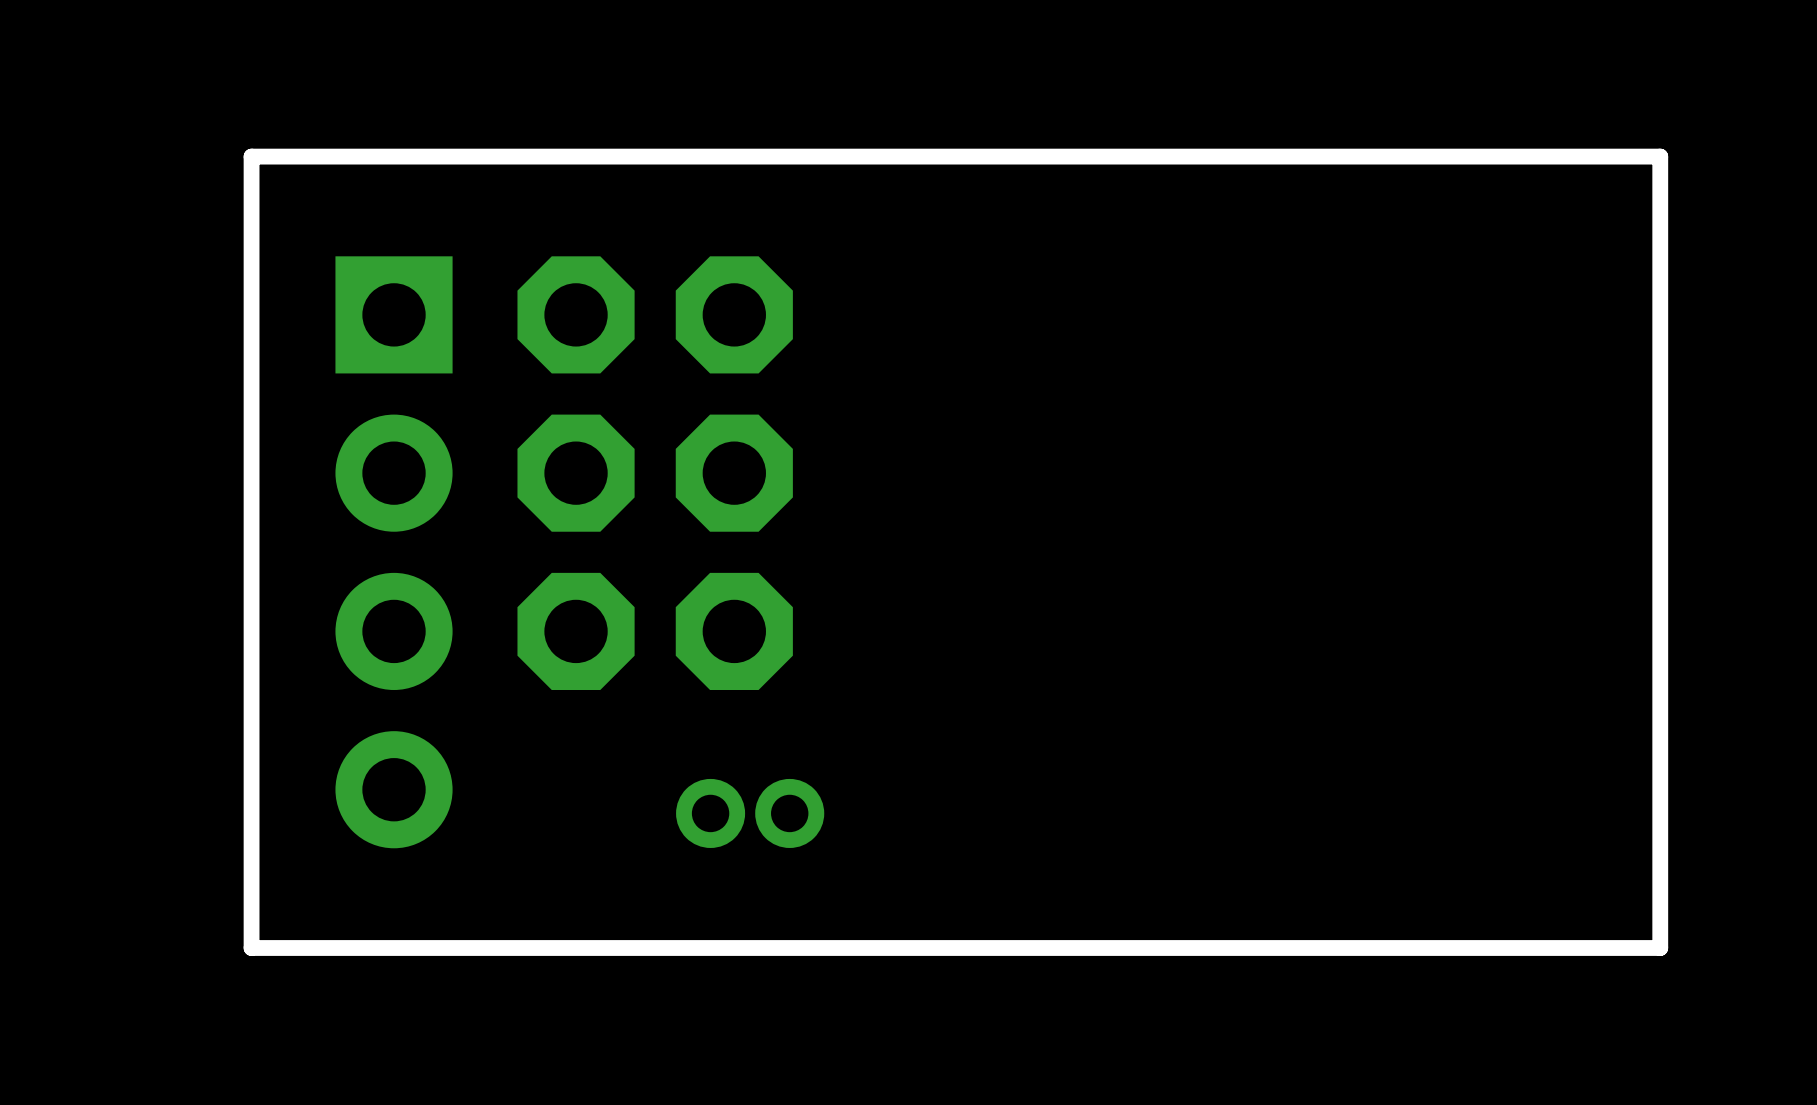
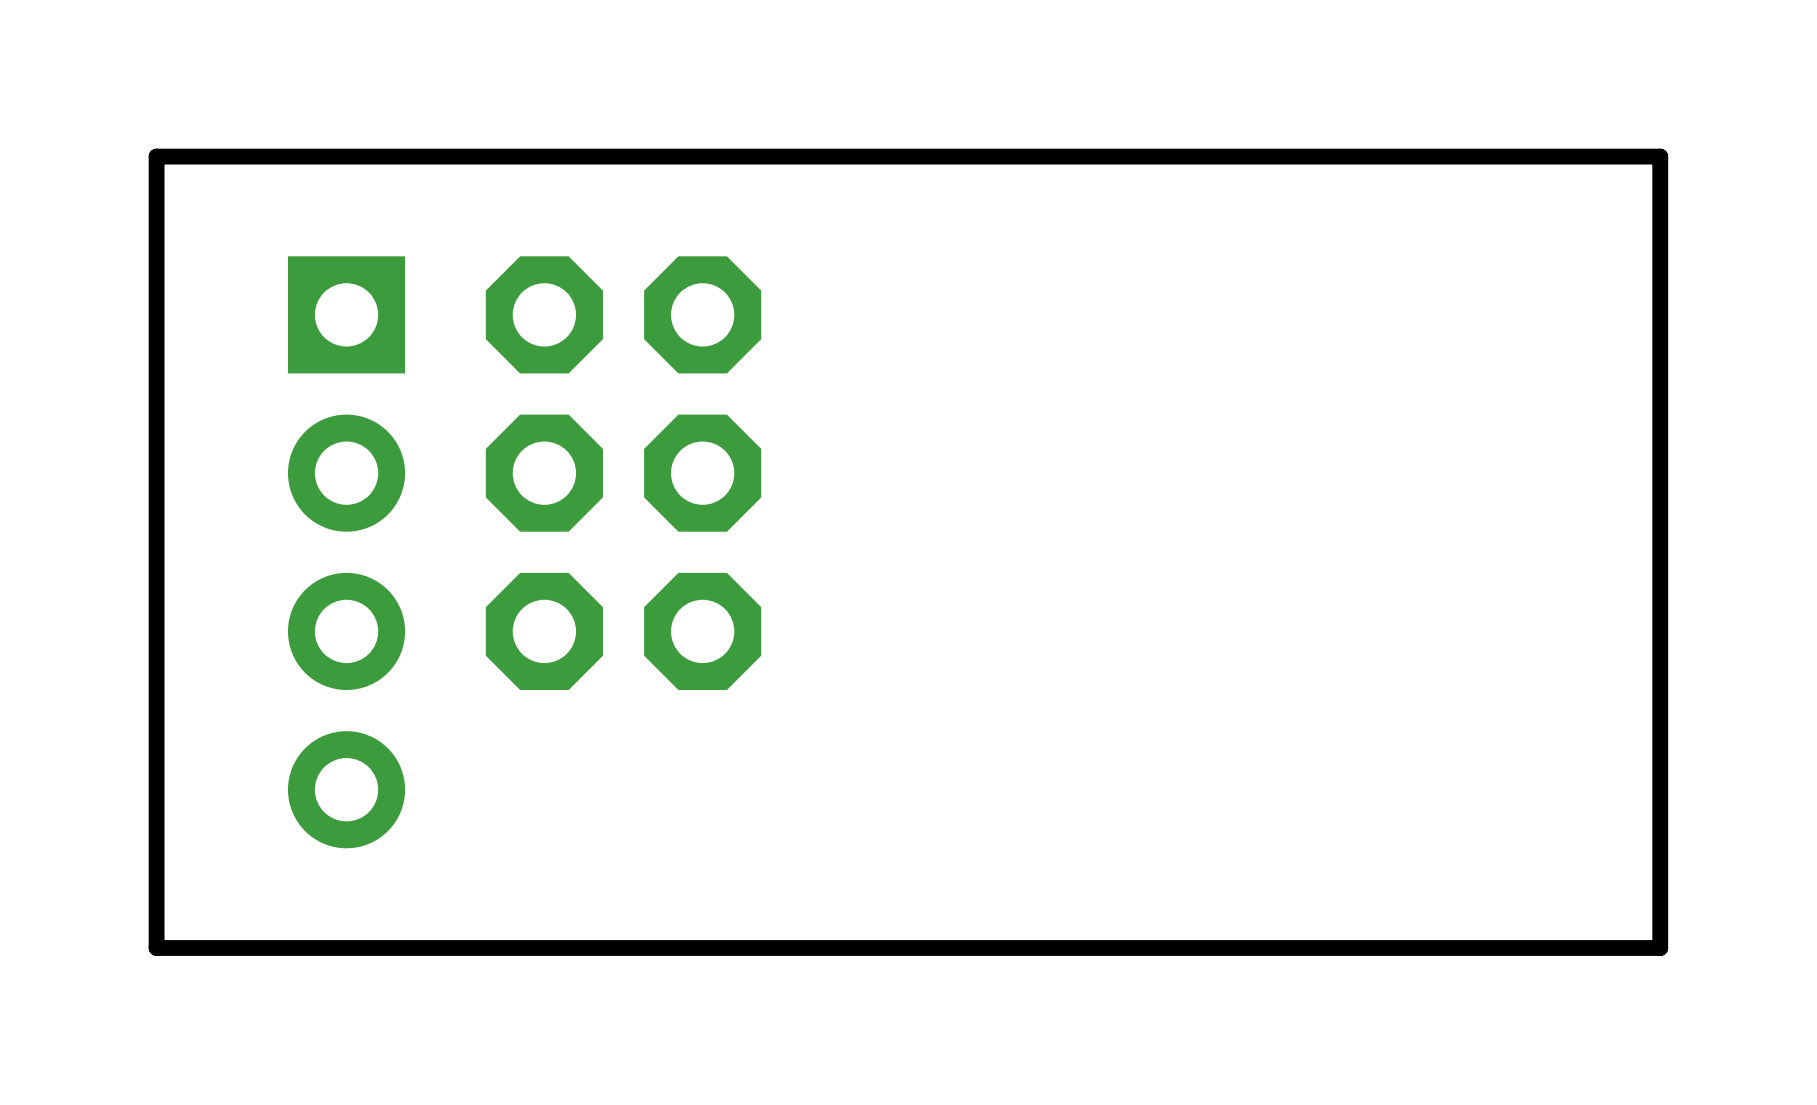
board edge: (251, 156) (251, 948) -> (251, 156) (156, 156) (156, 948) (251, 948)
part position: (655, 473) -> (623, 473)
part position: (394, 552) -> (346, 552)
via: (710, 813) -> none
via: (789, 813) -> none

